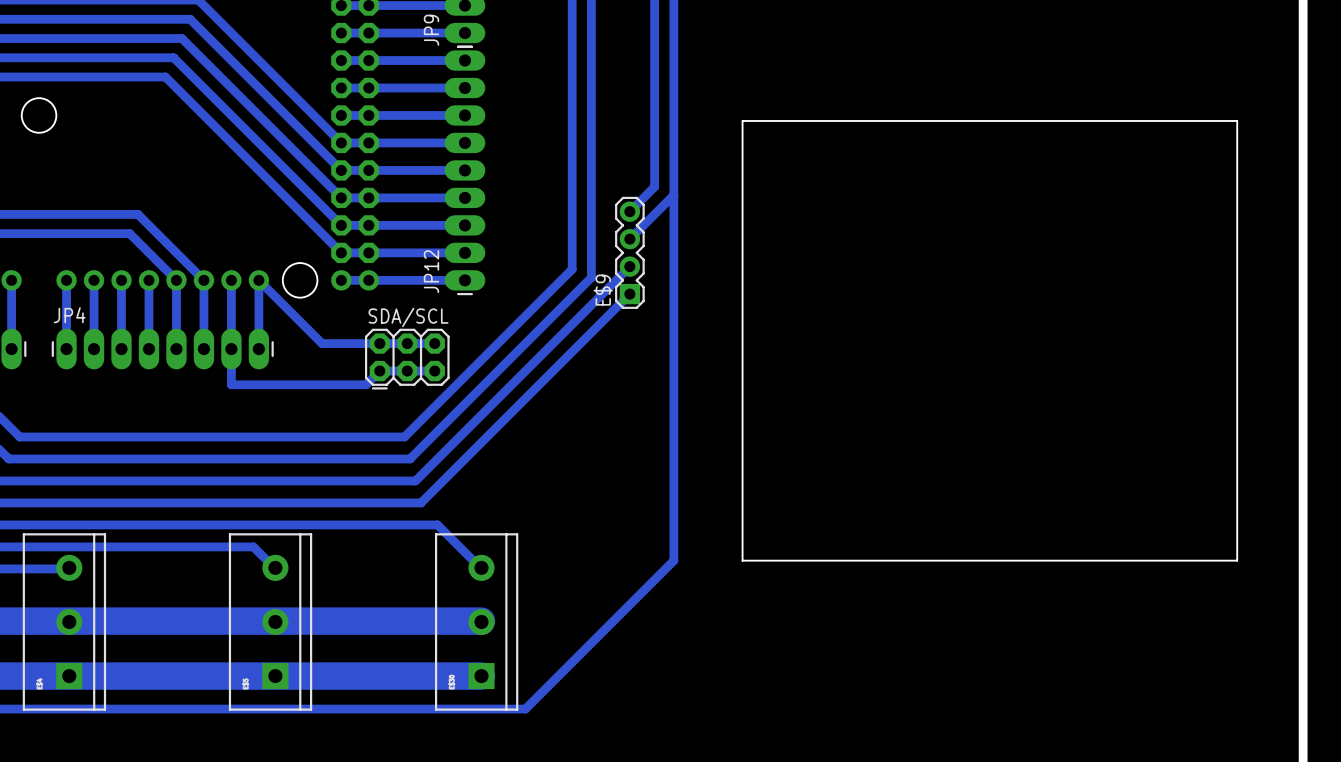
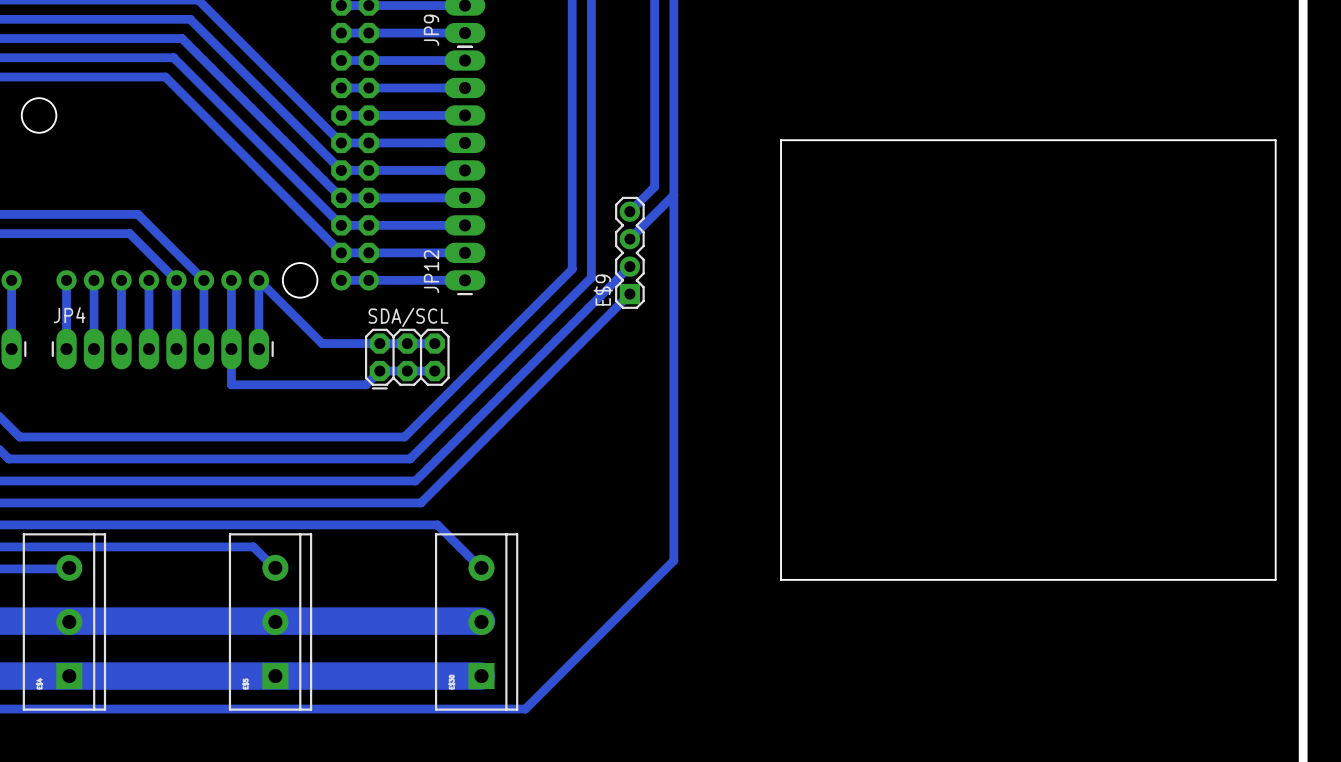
board edge: (742, 120) (1237, 120) (1237, 560) (742, 560) (742, 120) -> (781, 140) (1275, 140) (1275, 579) (781, 579) (781, 140)

